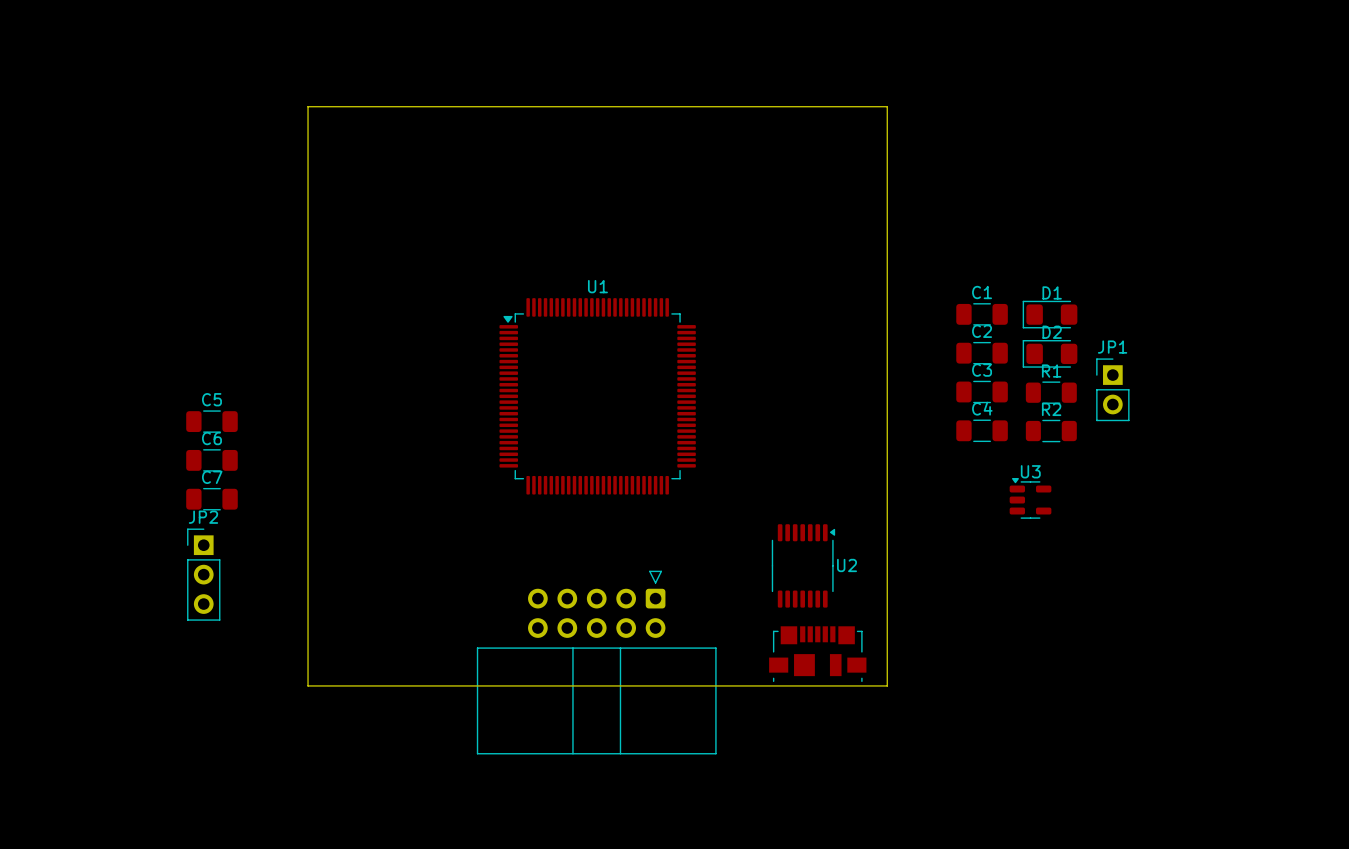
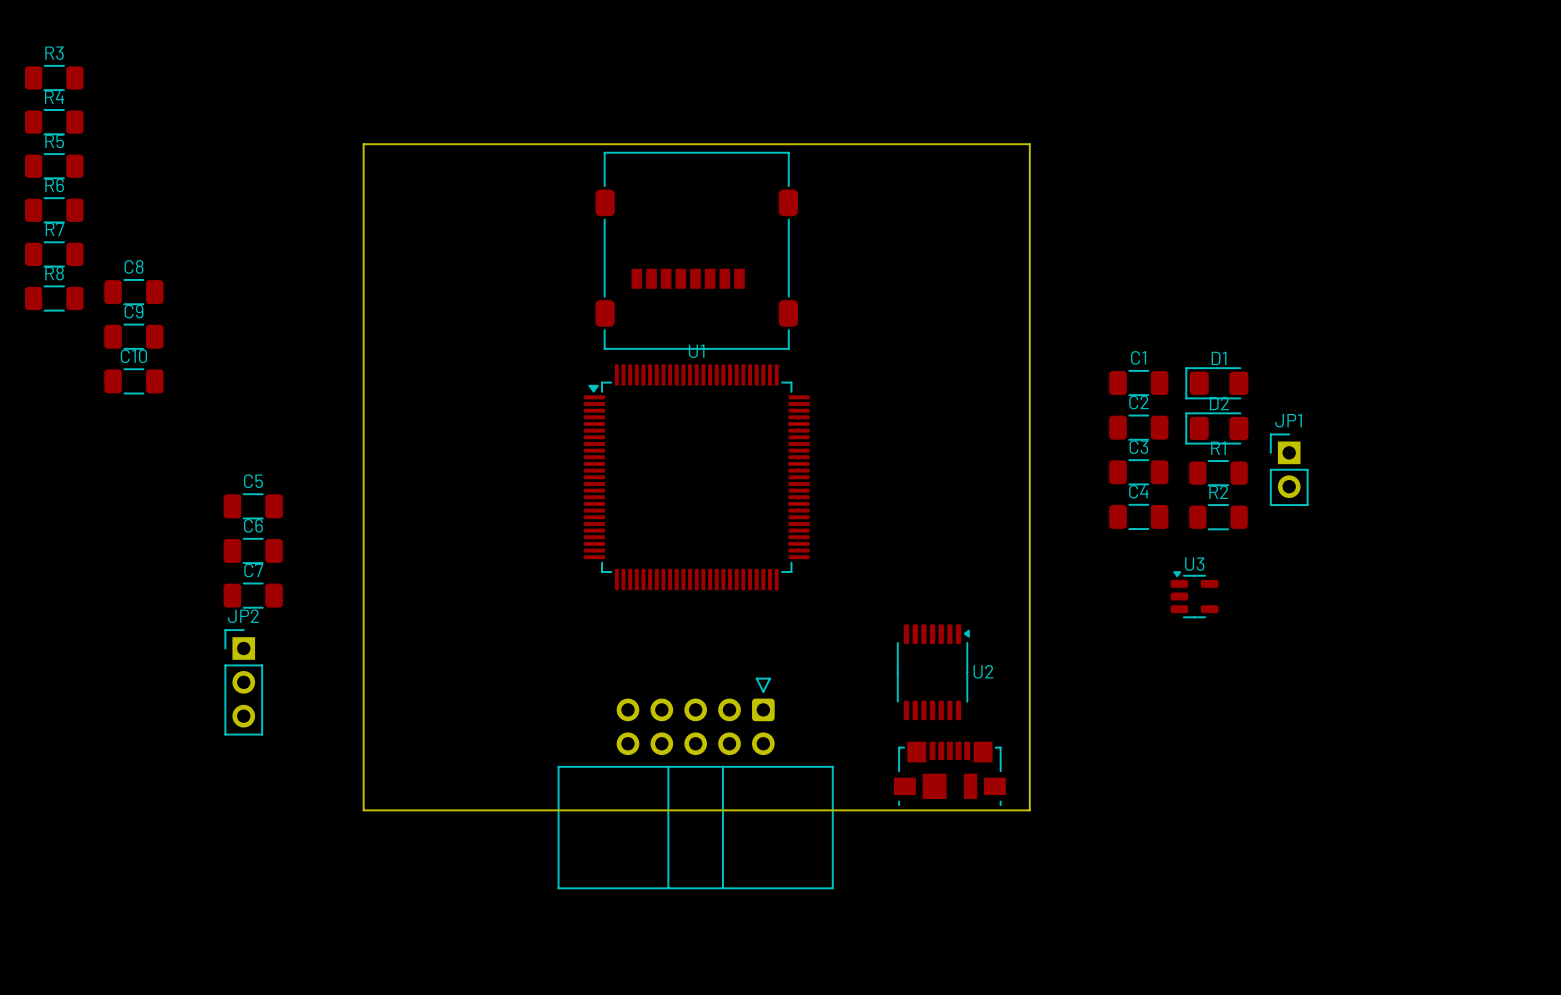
R3: none -> (54, 78)
R4: none -> (54, 122)
R5: none -> (54, 166)
R6: none -> (54, 210)
part: none -> (696, 250)
R7: none -> (54, 254)
C8: none -> (133, 292)
R8: none -> (54, 298)
C9: none -> (133, 336)
C10: none -> (133, 381)

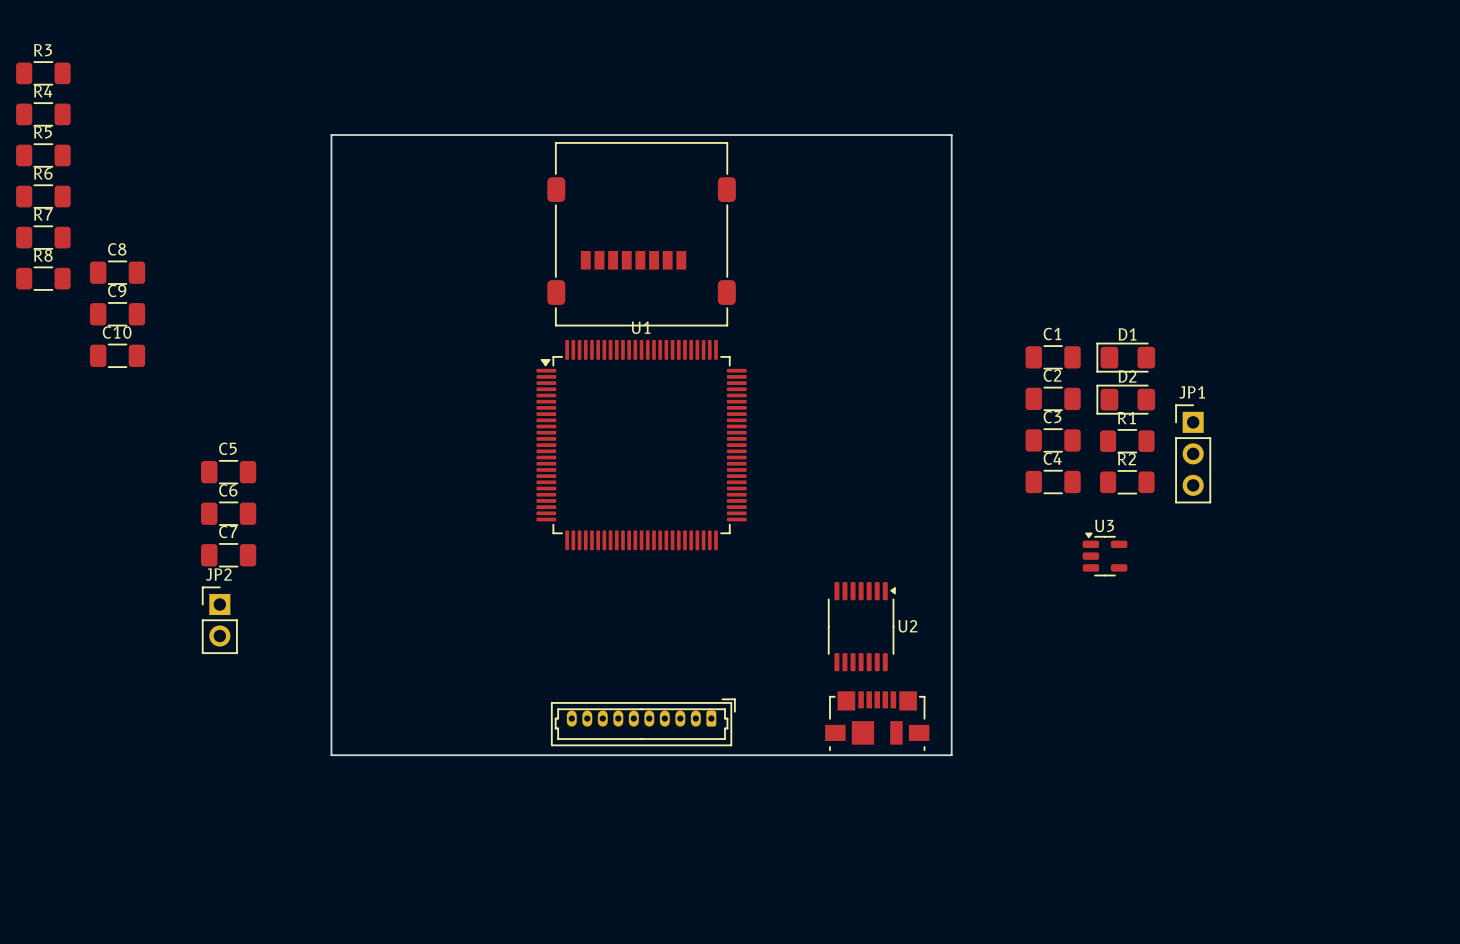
JP1 footprint: [1270, 433, 1309, 506] -> [1175, 404, 1212, 504]
JP2 footprint: [224, 629, 263, 736] -> [201, 586, 238, 654]
part footprint: [557, 677, 834, 890] -> [551, 698, 736, 747]

